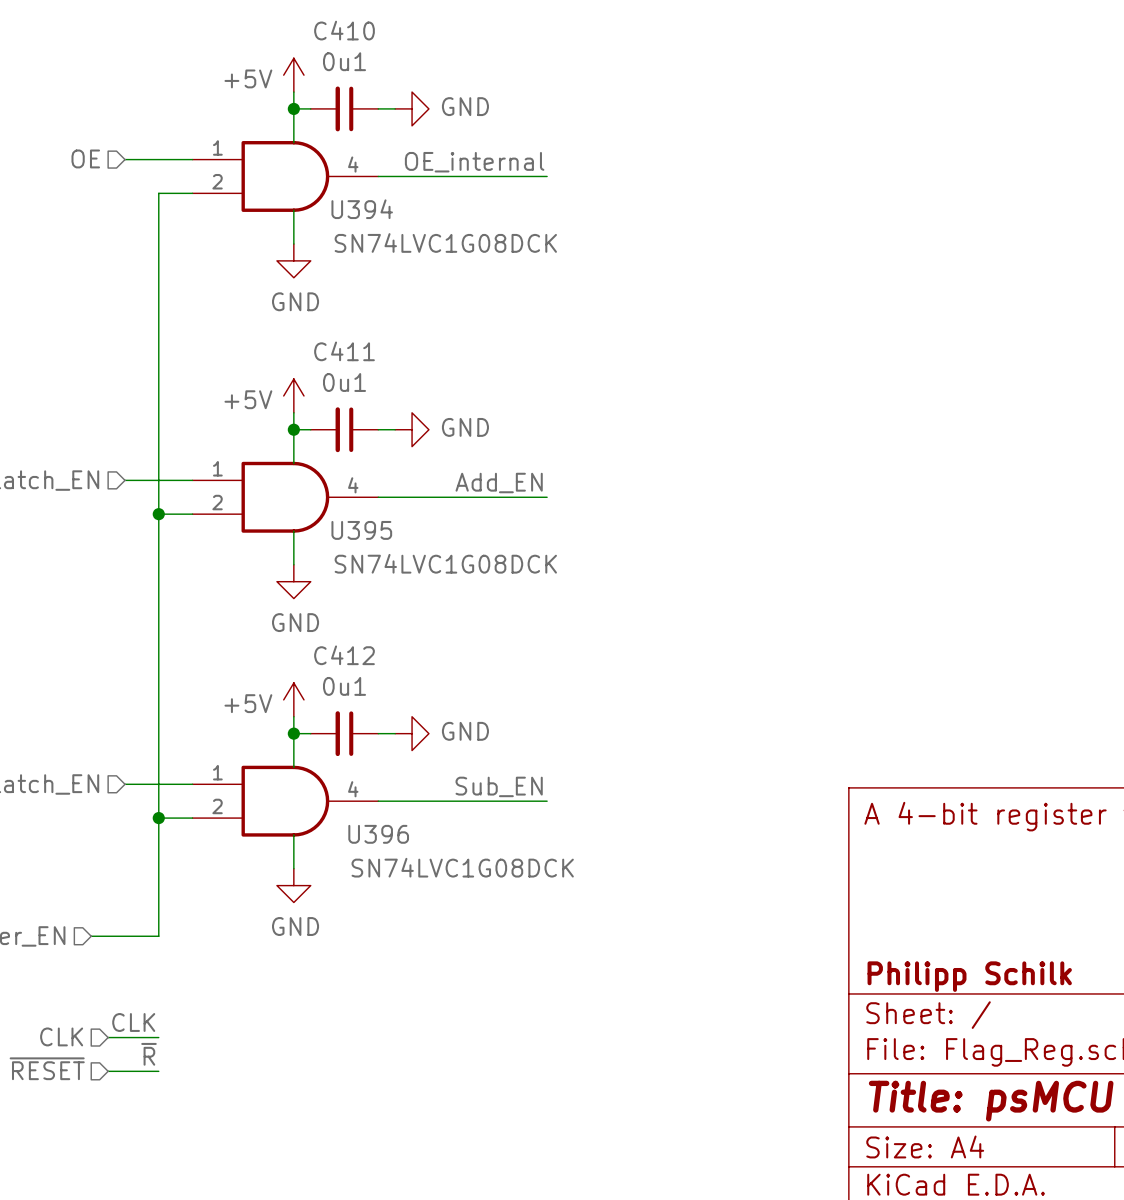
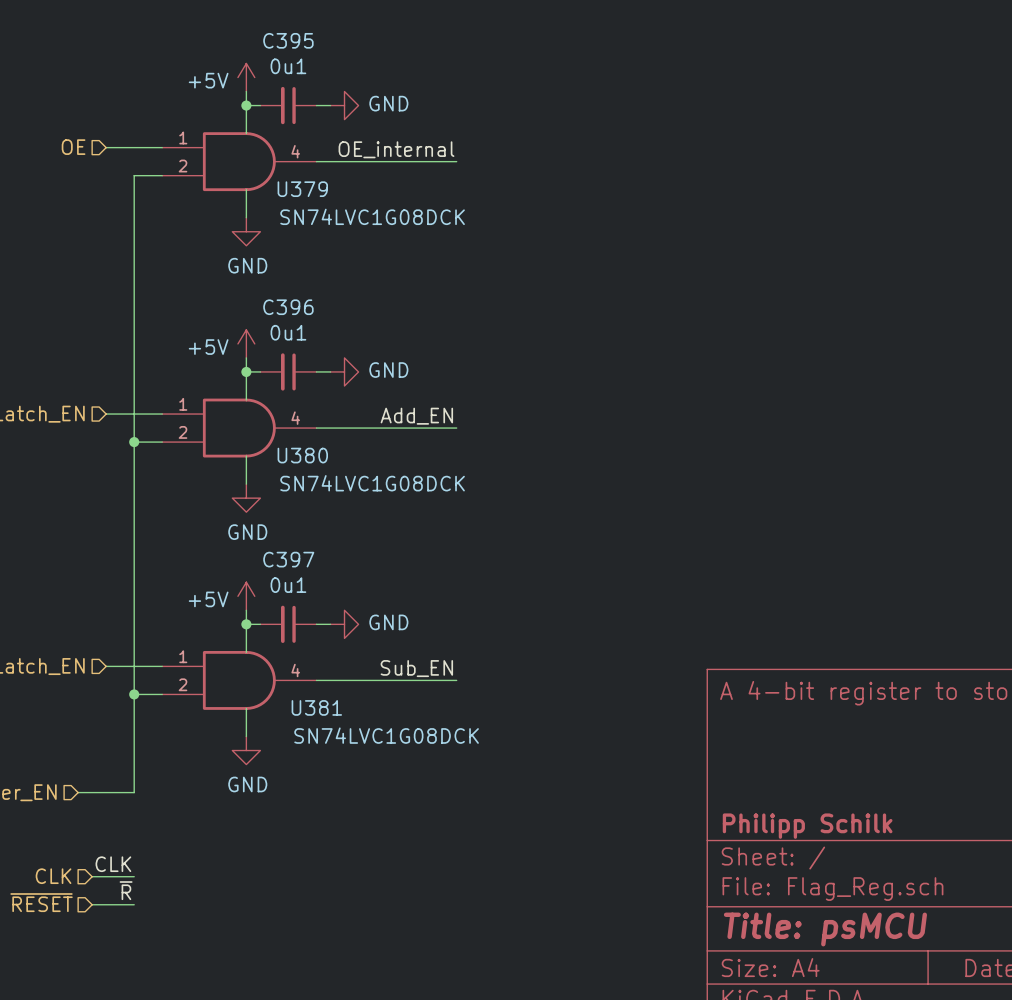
C410 name: C410 (344, 30) -> C395 (288, 40)
U394 name: U394 (362, 209) -> U379 (302, 189)
C411 name: C411 (344, 351) -> C396 (288, 307)
U395 name: U395 (361, 530) -> U380 (302, 455)
C412 name: C412 (344, 655) -> C397 (288, 559)
U396 name: U396 (378, 834) -> U381 (316, 707)

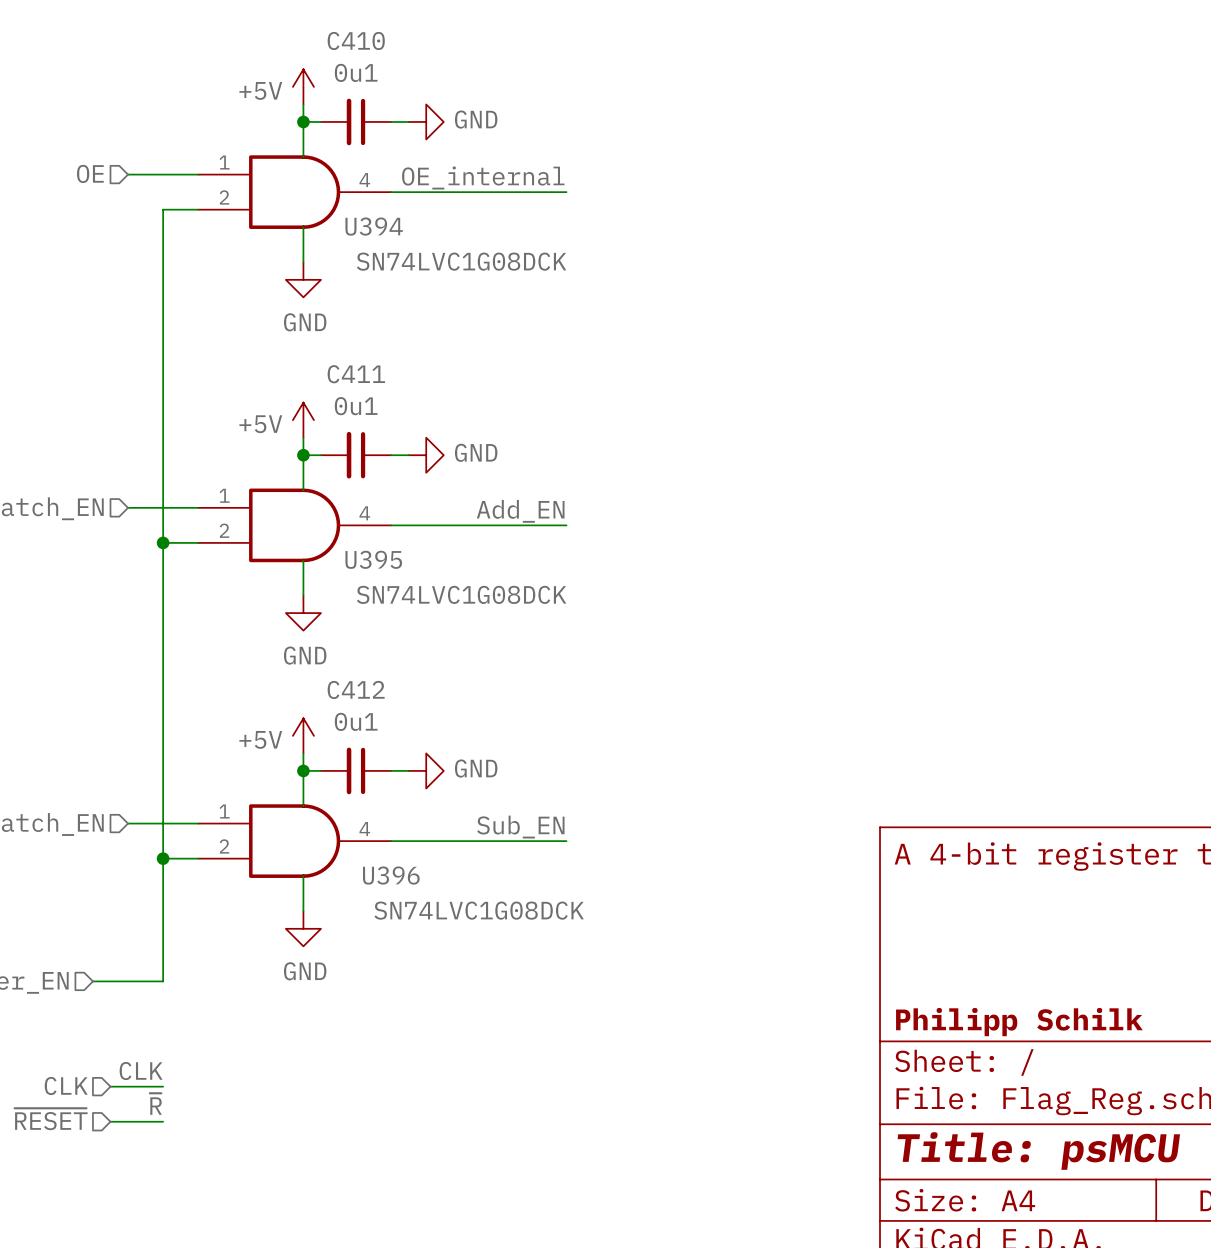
C395 name: C395 (288, 40) -> C410 (356, 40)
U379 name: U379 (302, 189) -> U394 (374, 226)
C396 name: C396 (288, 307) -> C411 (356, 374)
U380 name: U380 (302, 455) -> U395 (373, 559)
C397 name: C397 (288, 559) -> C412 (356, 689)
U381 name: U381 (316, 707) -> U396 (391, 875)

